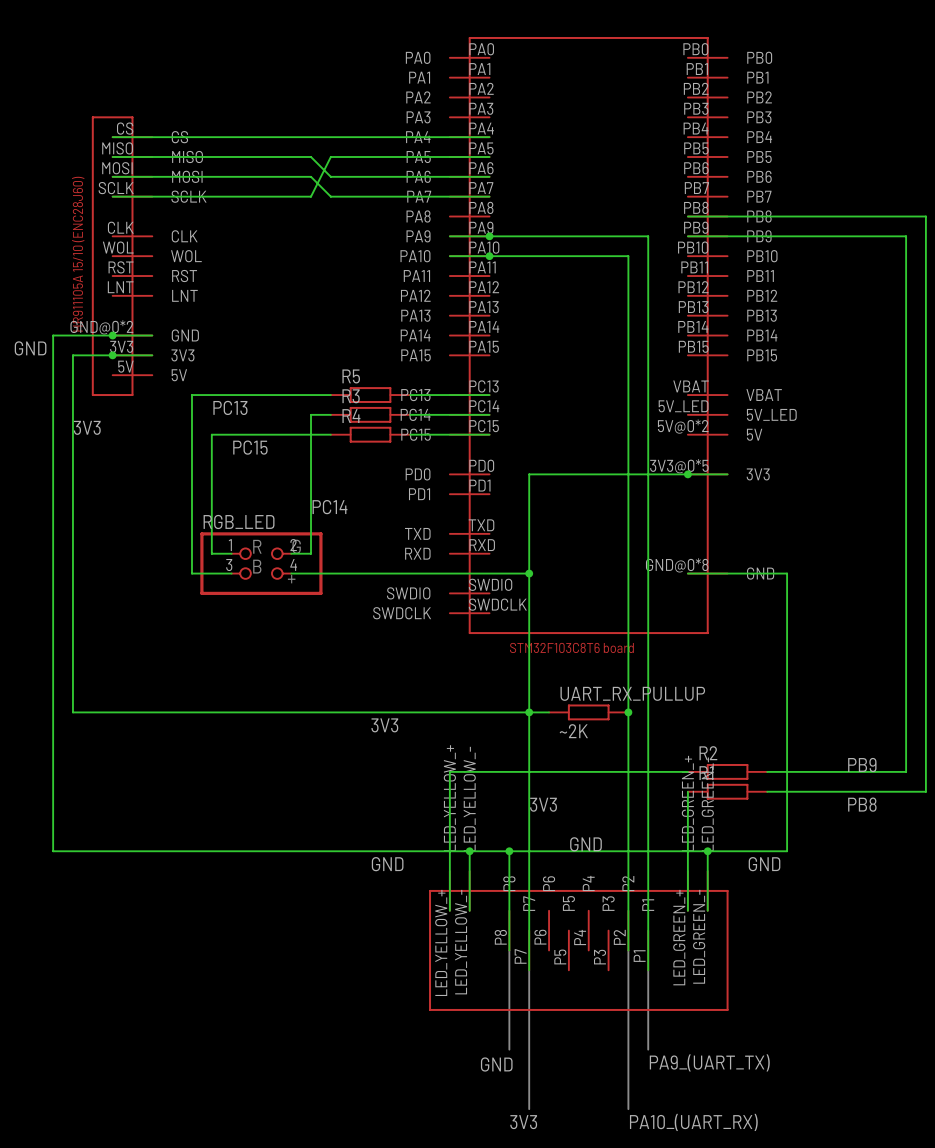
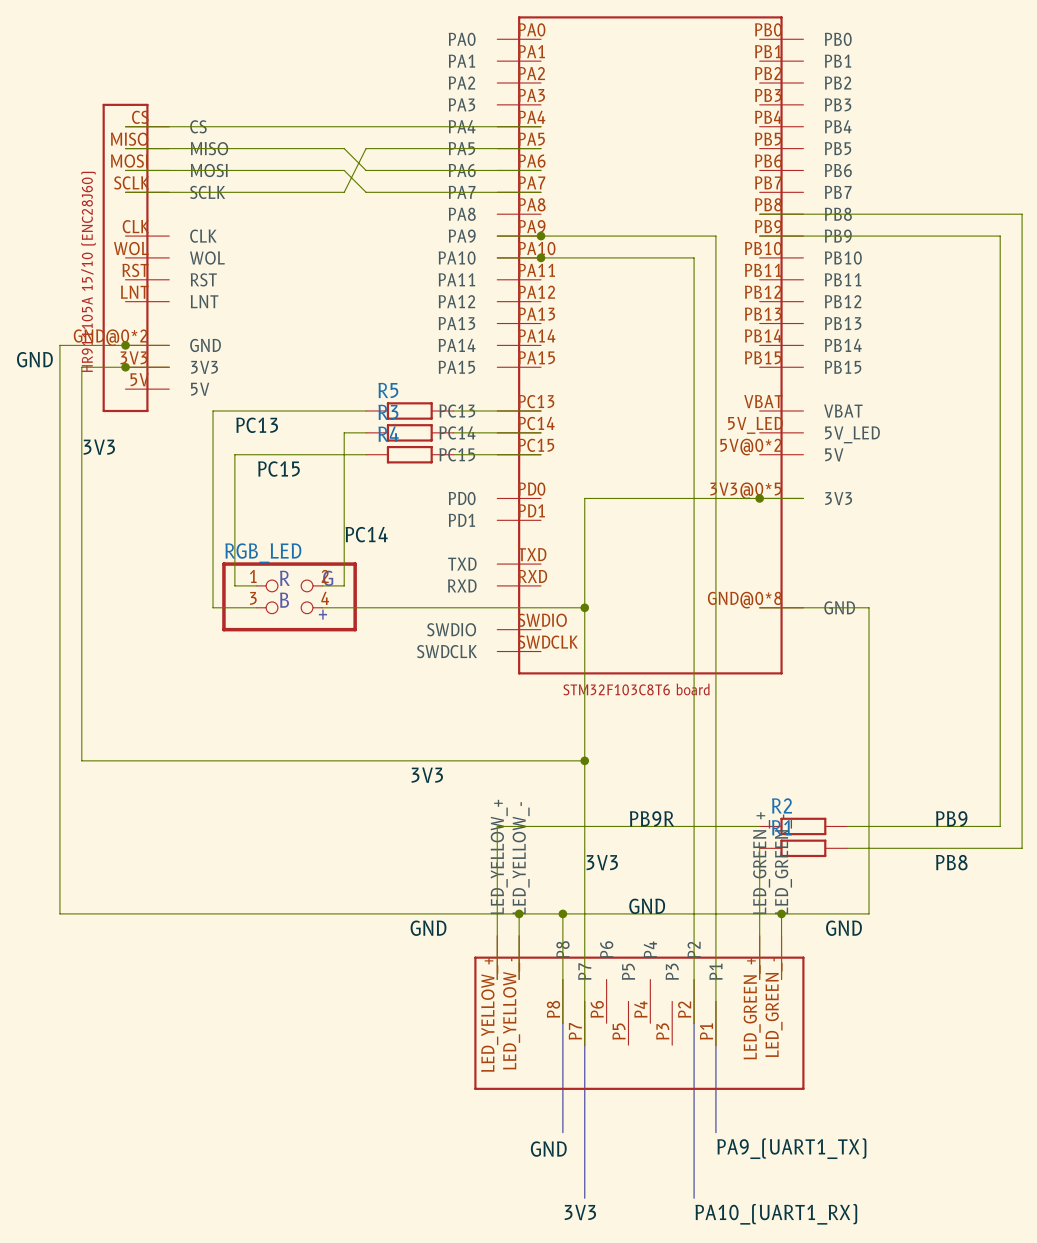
wire: (529, 712) (549, 712) -> none
UART_RX_PULLUP: ~2K (588, 712) -> none
junction: (628, 712) -> none
label: none -> PB9R (651, 818)
label: PA9_(UART_TX) (709, 1062) -> PA9_(UART1_TX) (791, 1148)
label: PA10_(UART_RX) (693, 1122) -> PA10_(UART1_RX) (776, 1214)

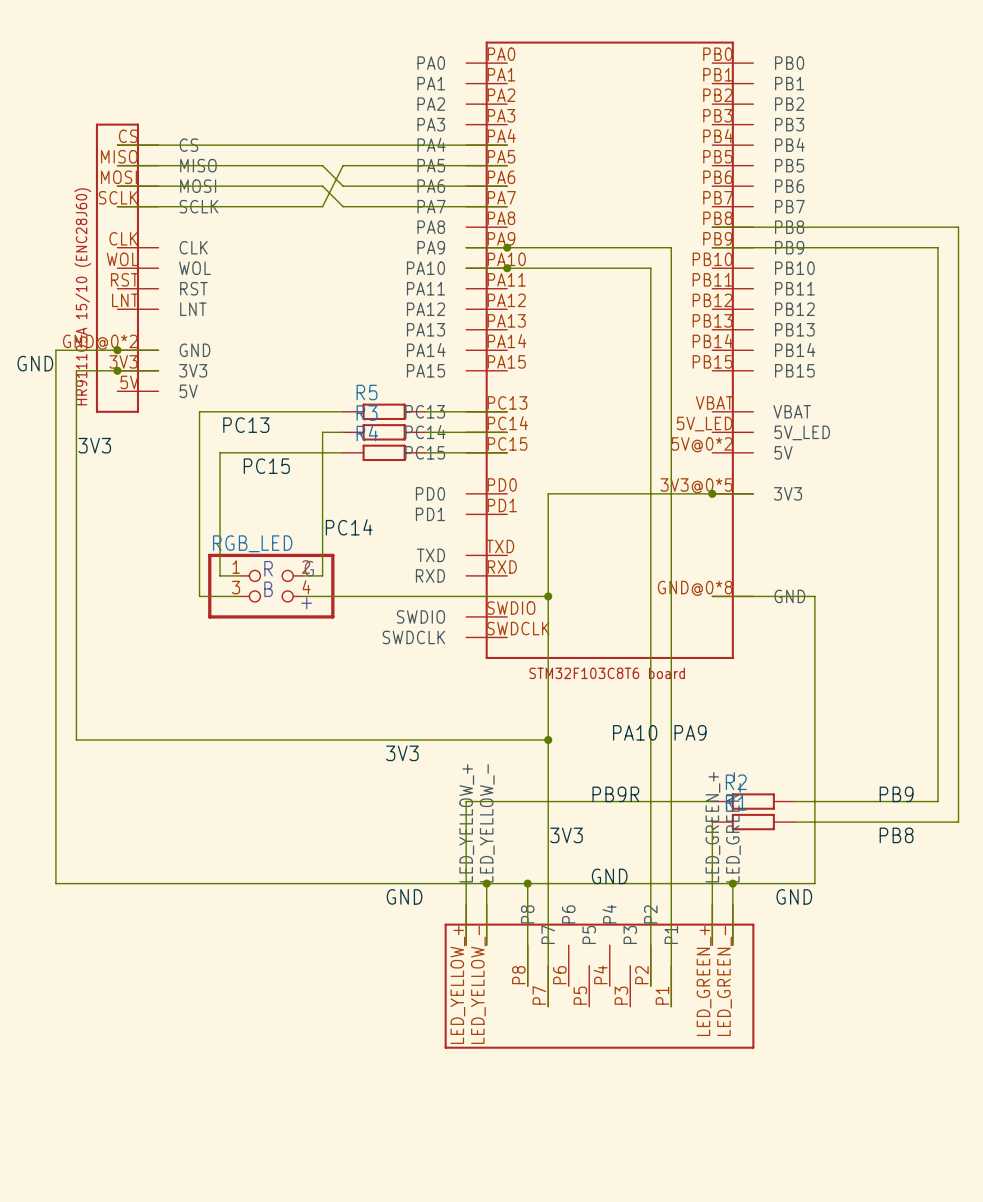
label: none -> PA10 (635, 732)
label: none -> PA9 (690, 732)
line: (562, 1023) (562, 1132) -> none
line: (694, 1023) (694, 1198) -> none
line: (584, 1045) (584, 1198) -> none
line: (715, 1045) (715, 1132) -> none
label: PA9_(UART1_TX) (791, 1148) -> none
label: GND (548, 1149) -> none
label: 3V3 (580, 1212) -> none
label: PA10_(UART1_RX) (776, 1214) -> none

